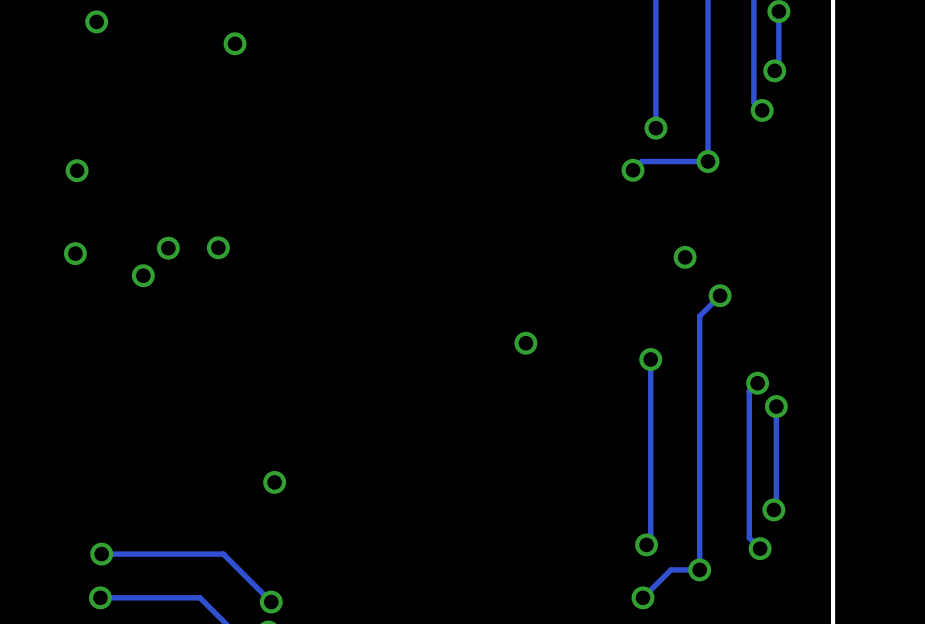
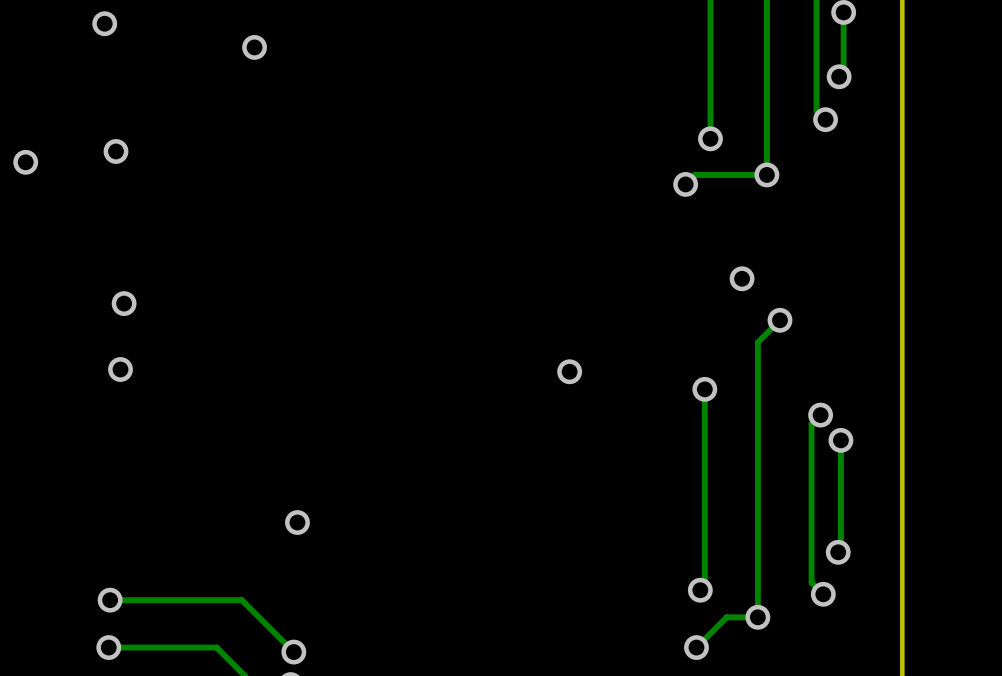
via: none -> (115, 151)
via: none -> (25, 162)
via: (77, 170) -> none
via: (218, 247) -> none
via: (168, 248) -> none
via: (75, 253) -> none
via: (143, 275) -> none
via: none -> (124, 303)
via: none -> (120, 369)

